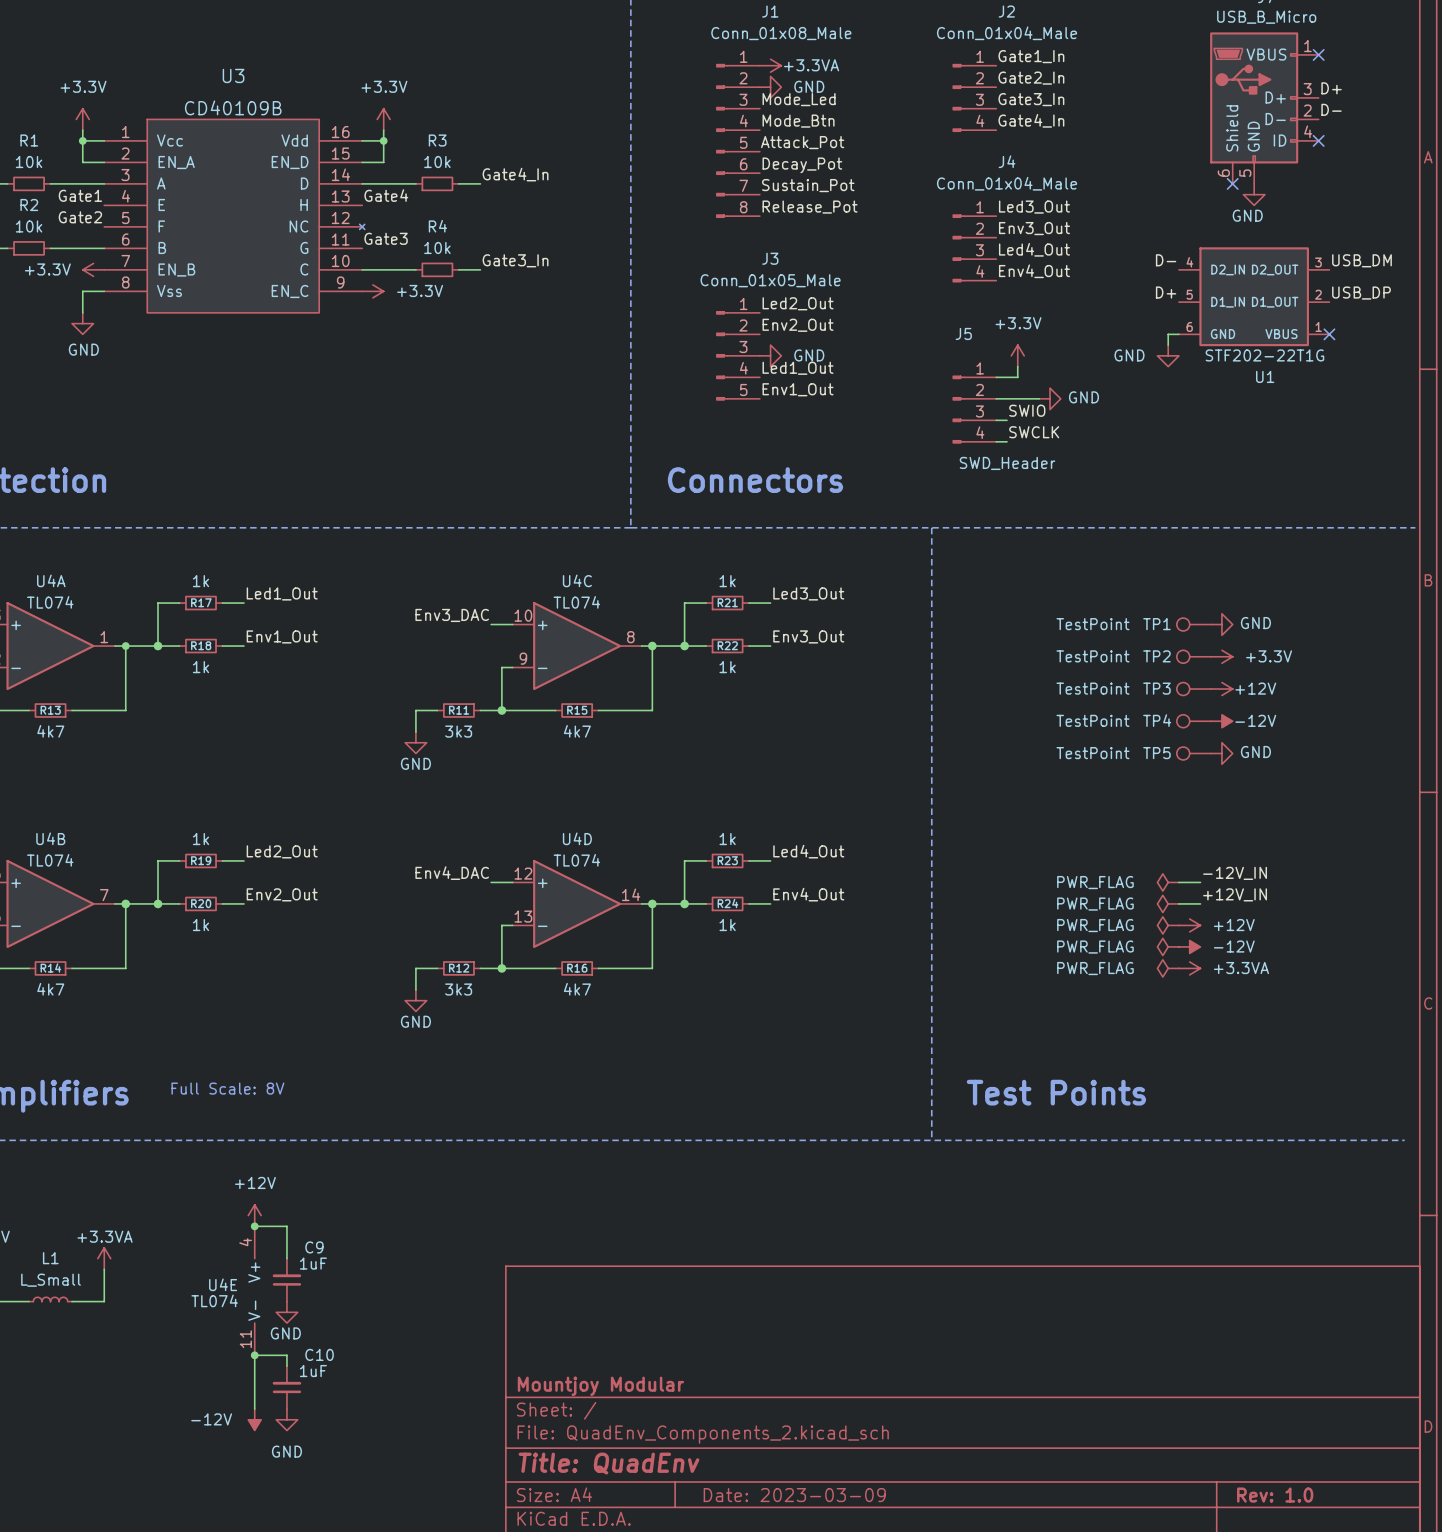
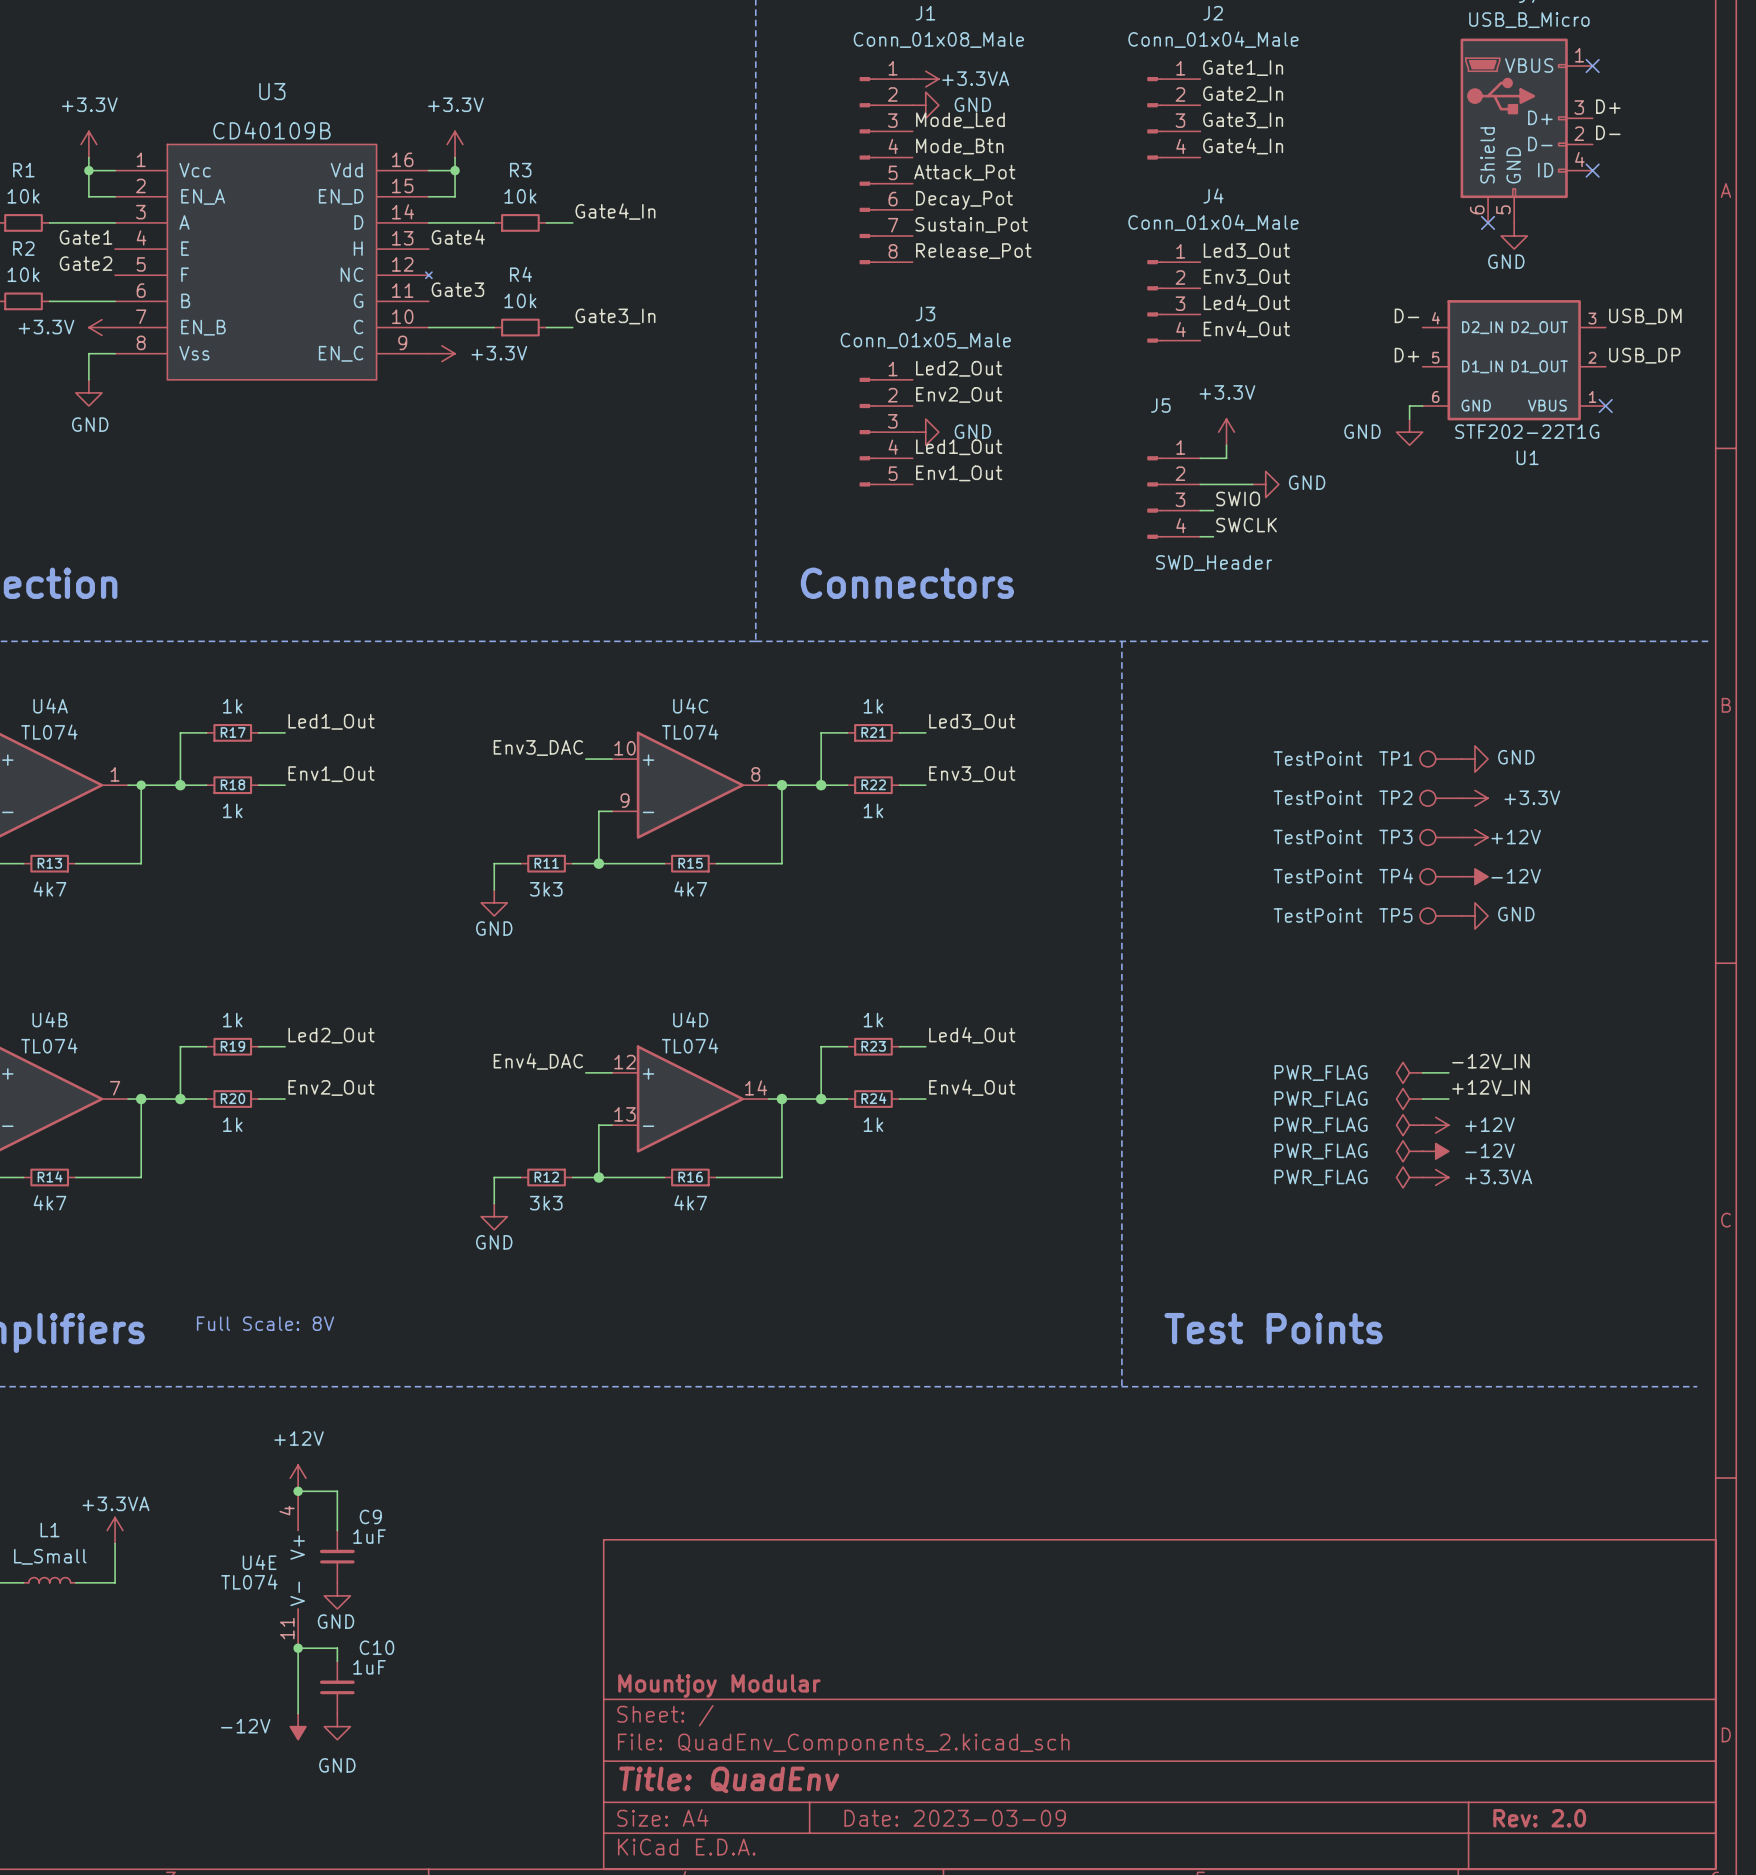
title block: Rev: 1.0 (1275, 1495) -> Rev: 2.0 (1539, 1818)

